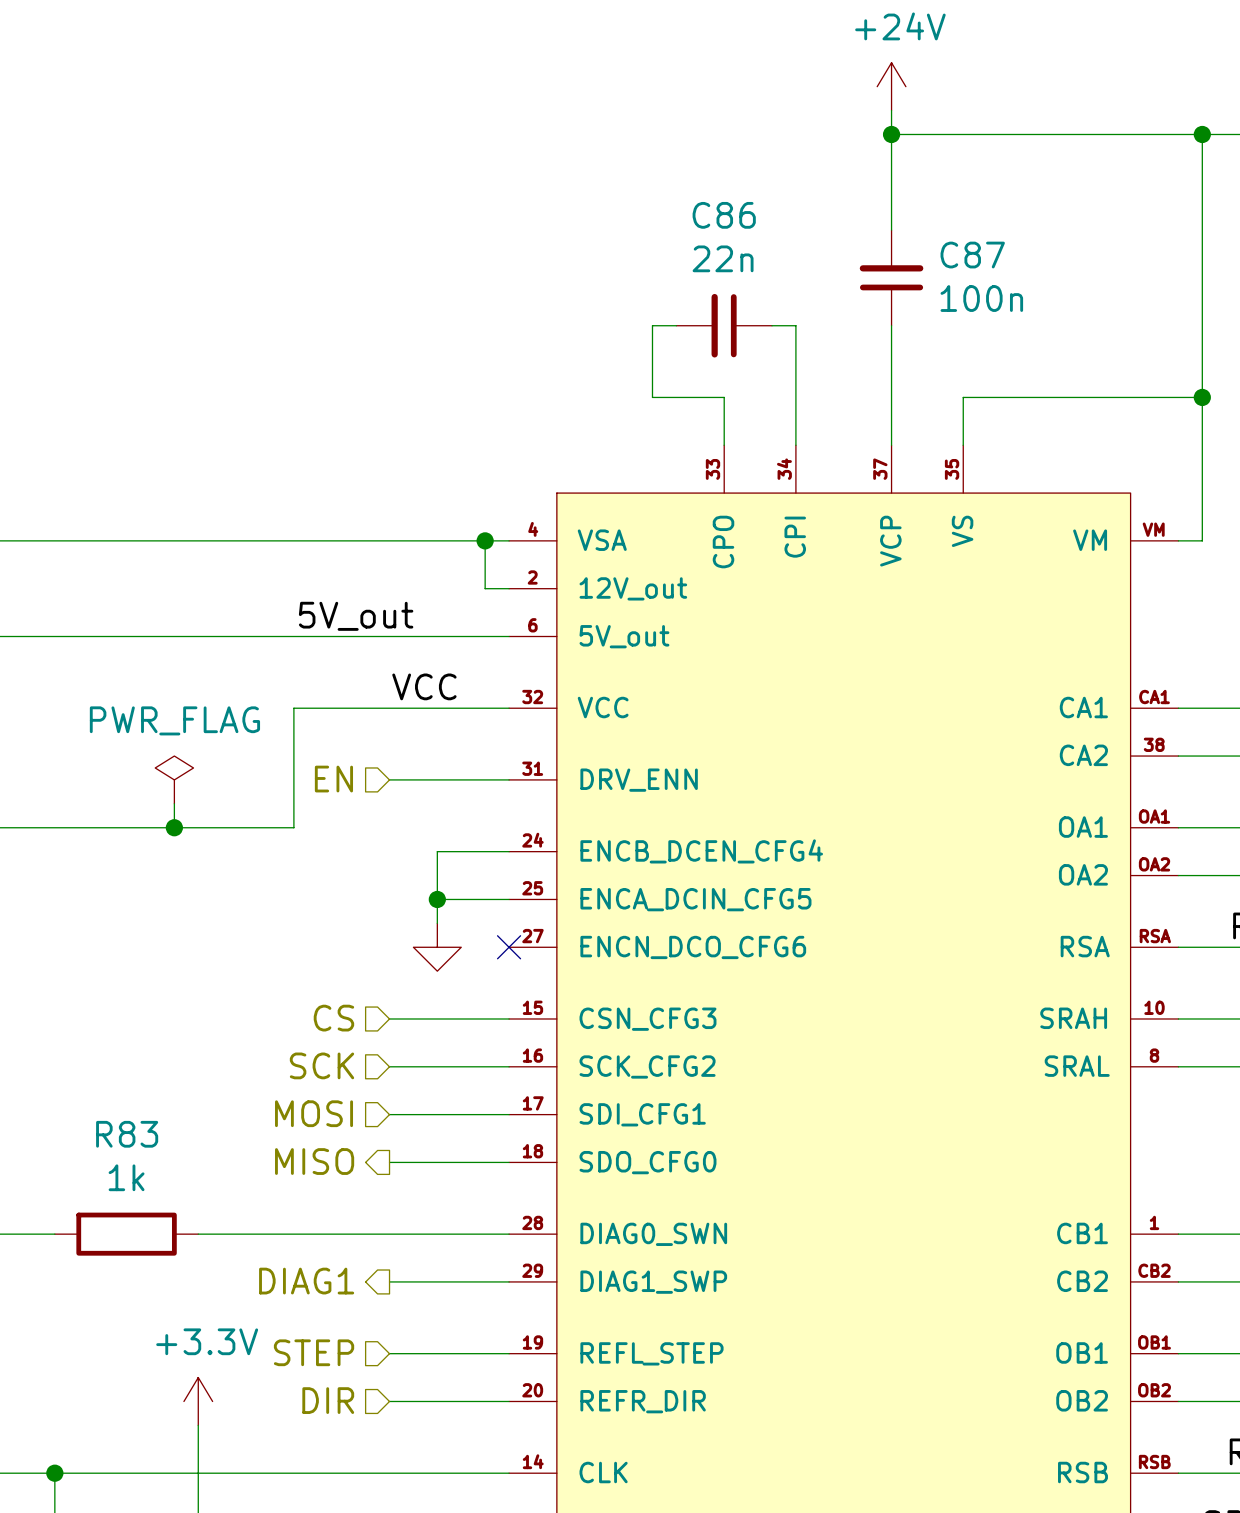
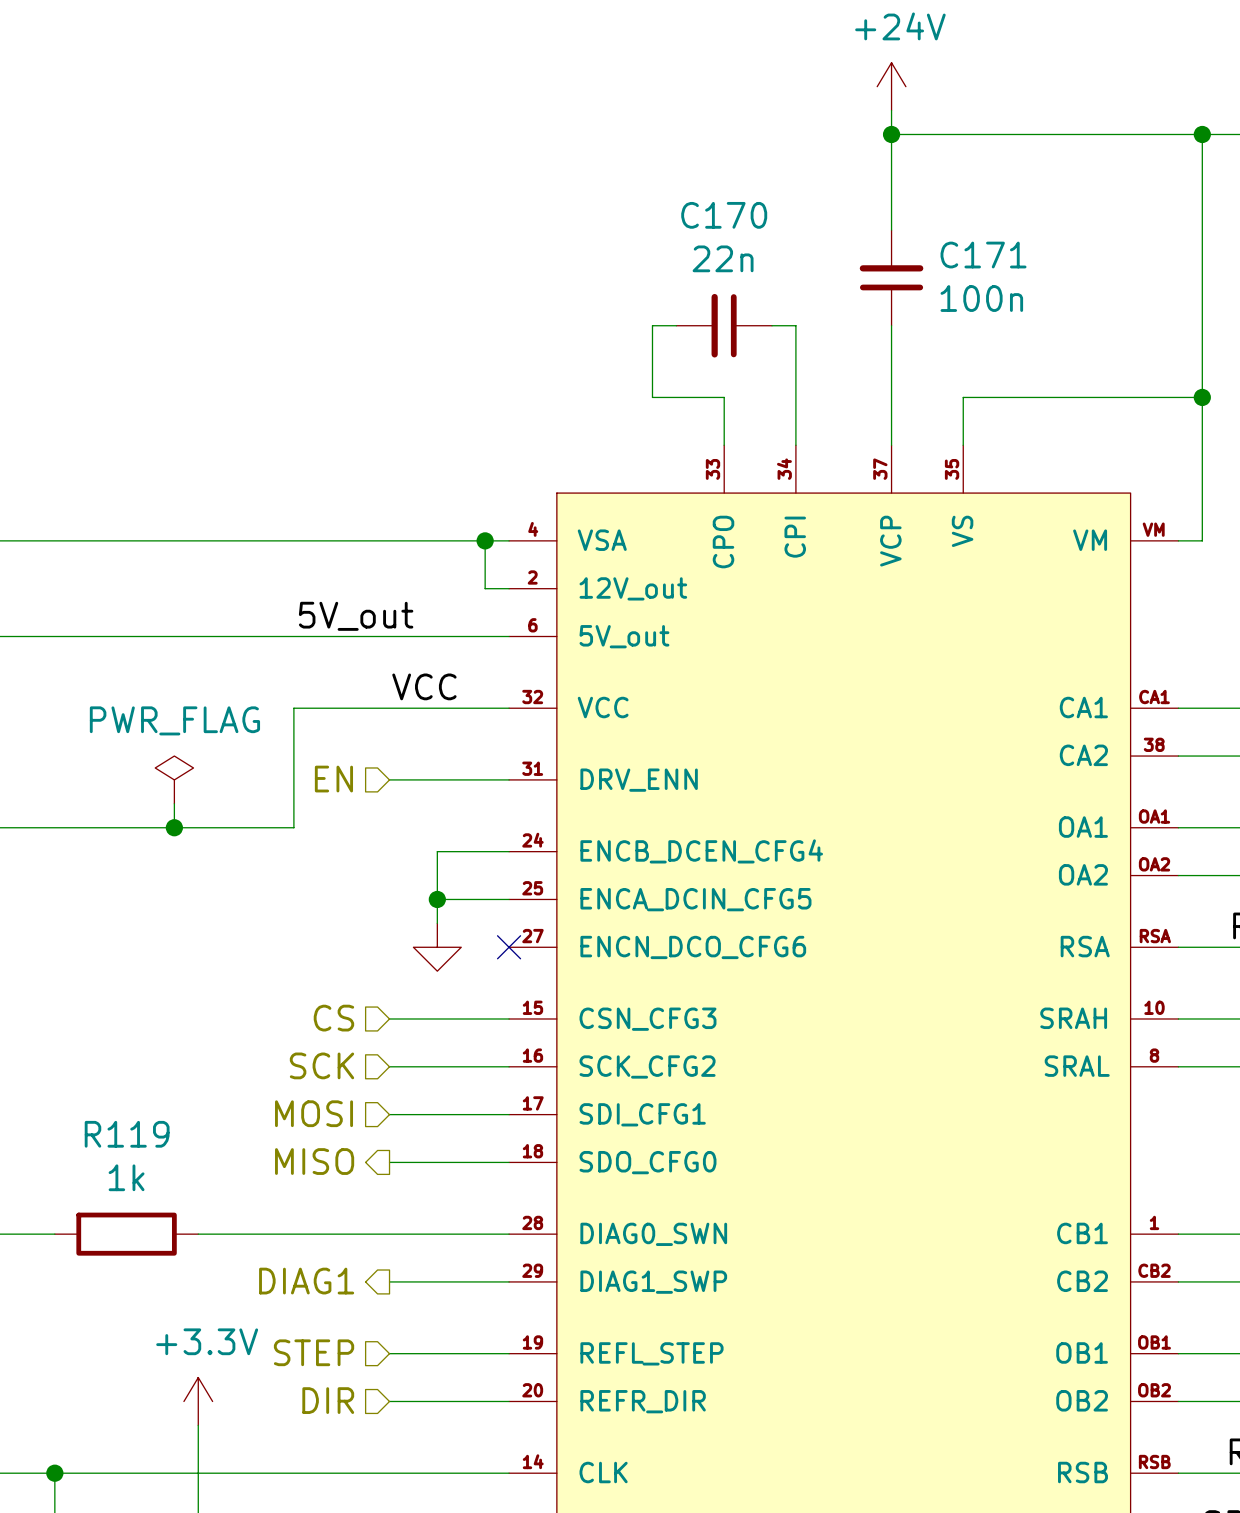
C86 name: C86 (724, 215) -> C170 (724, 215)
C87 name: C87 (972, 255) -> C171 (983, 255)
R83 name: R83 (127, 1134) -> R119 (127, 1134)

